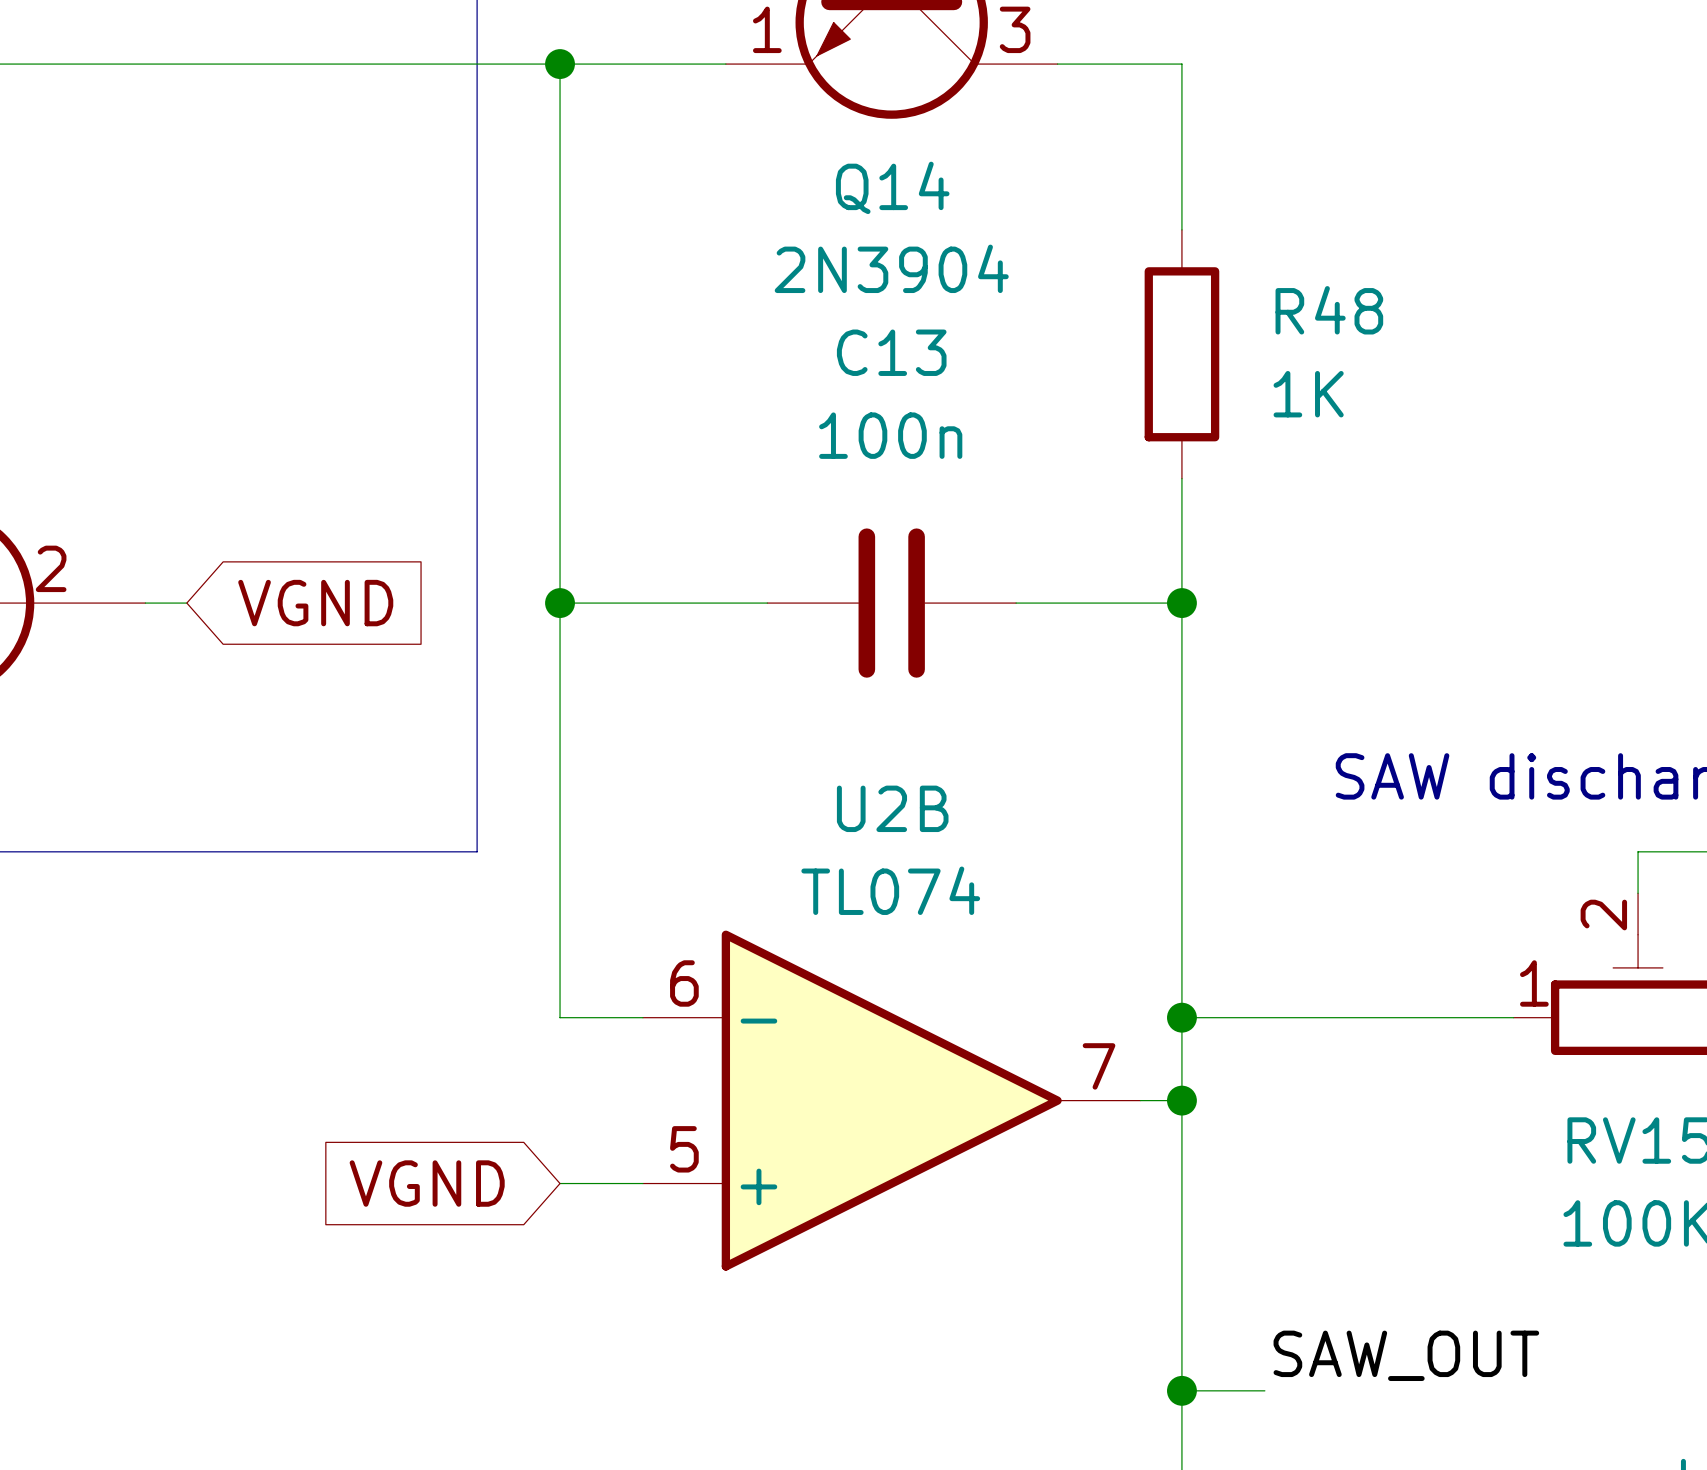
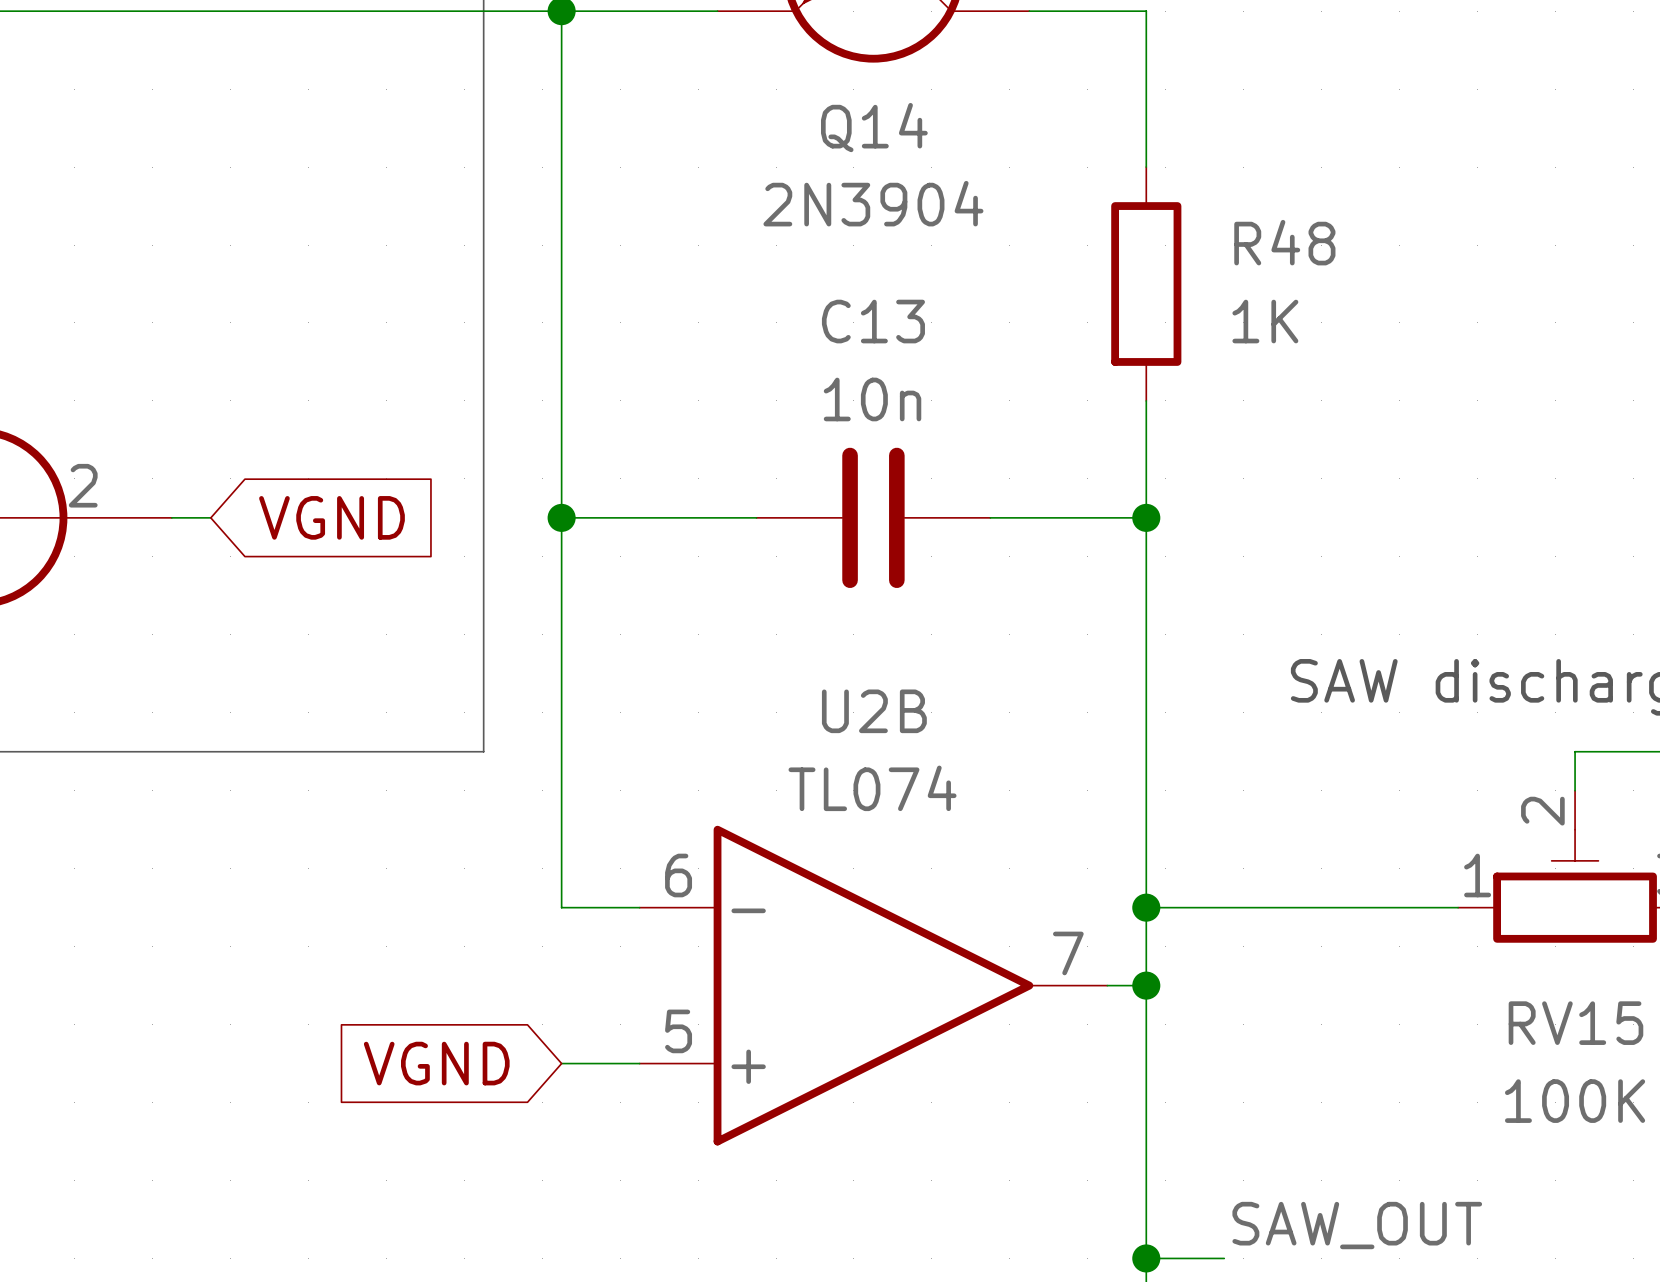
C13 name position: C13 (891, 352) -> C13 (873, 321)
C13 value: 100n (890, 435) -> 10n (872, 399)

